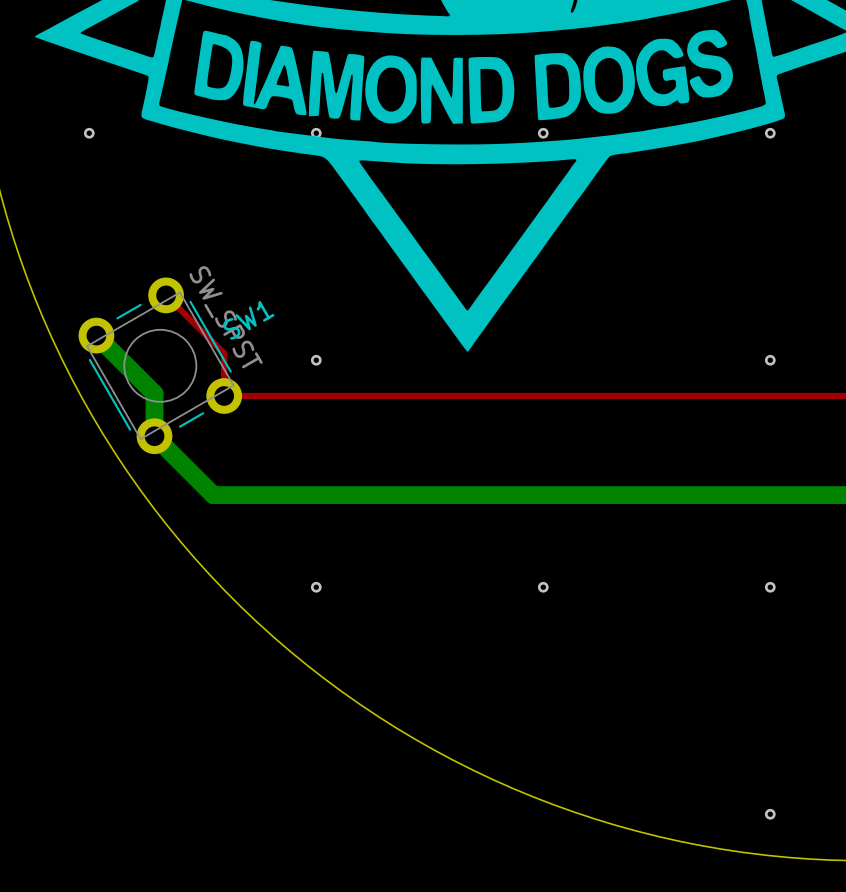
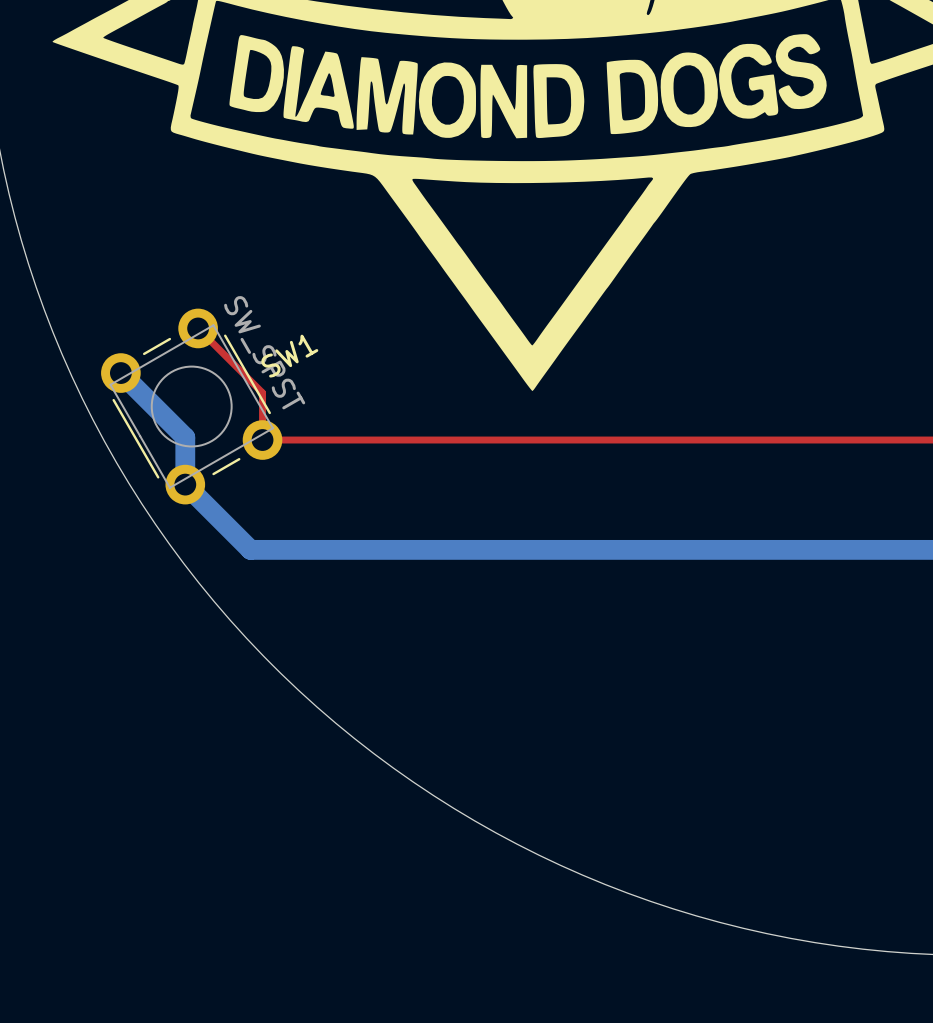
via: (89, 133) -> none
via: (316, 133) -> none
via: (543, 133) -> none
via: (770, 133) -> none
via: (316, 360) -> none
via: (770, 360) -> none
via: (316, 587) -> none
via: (543, 587) -> none
via: (770, 587) -> none
via: (770, 814) -> none

